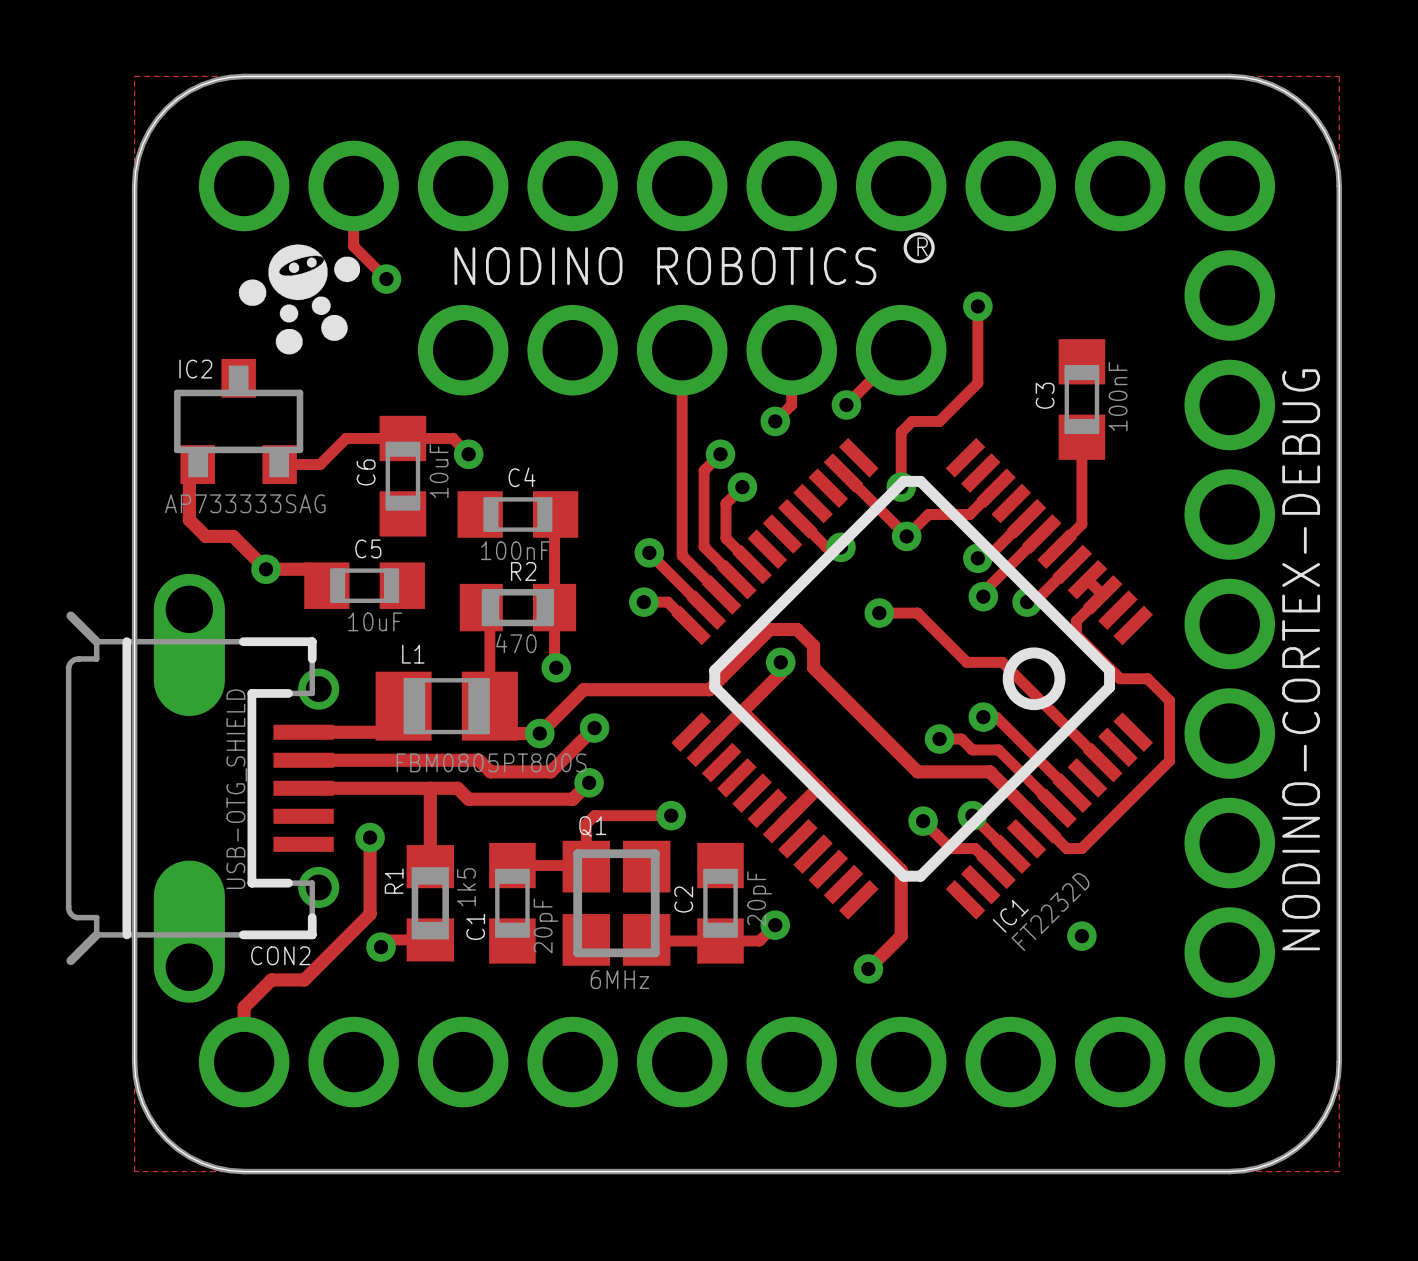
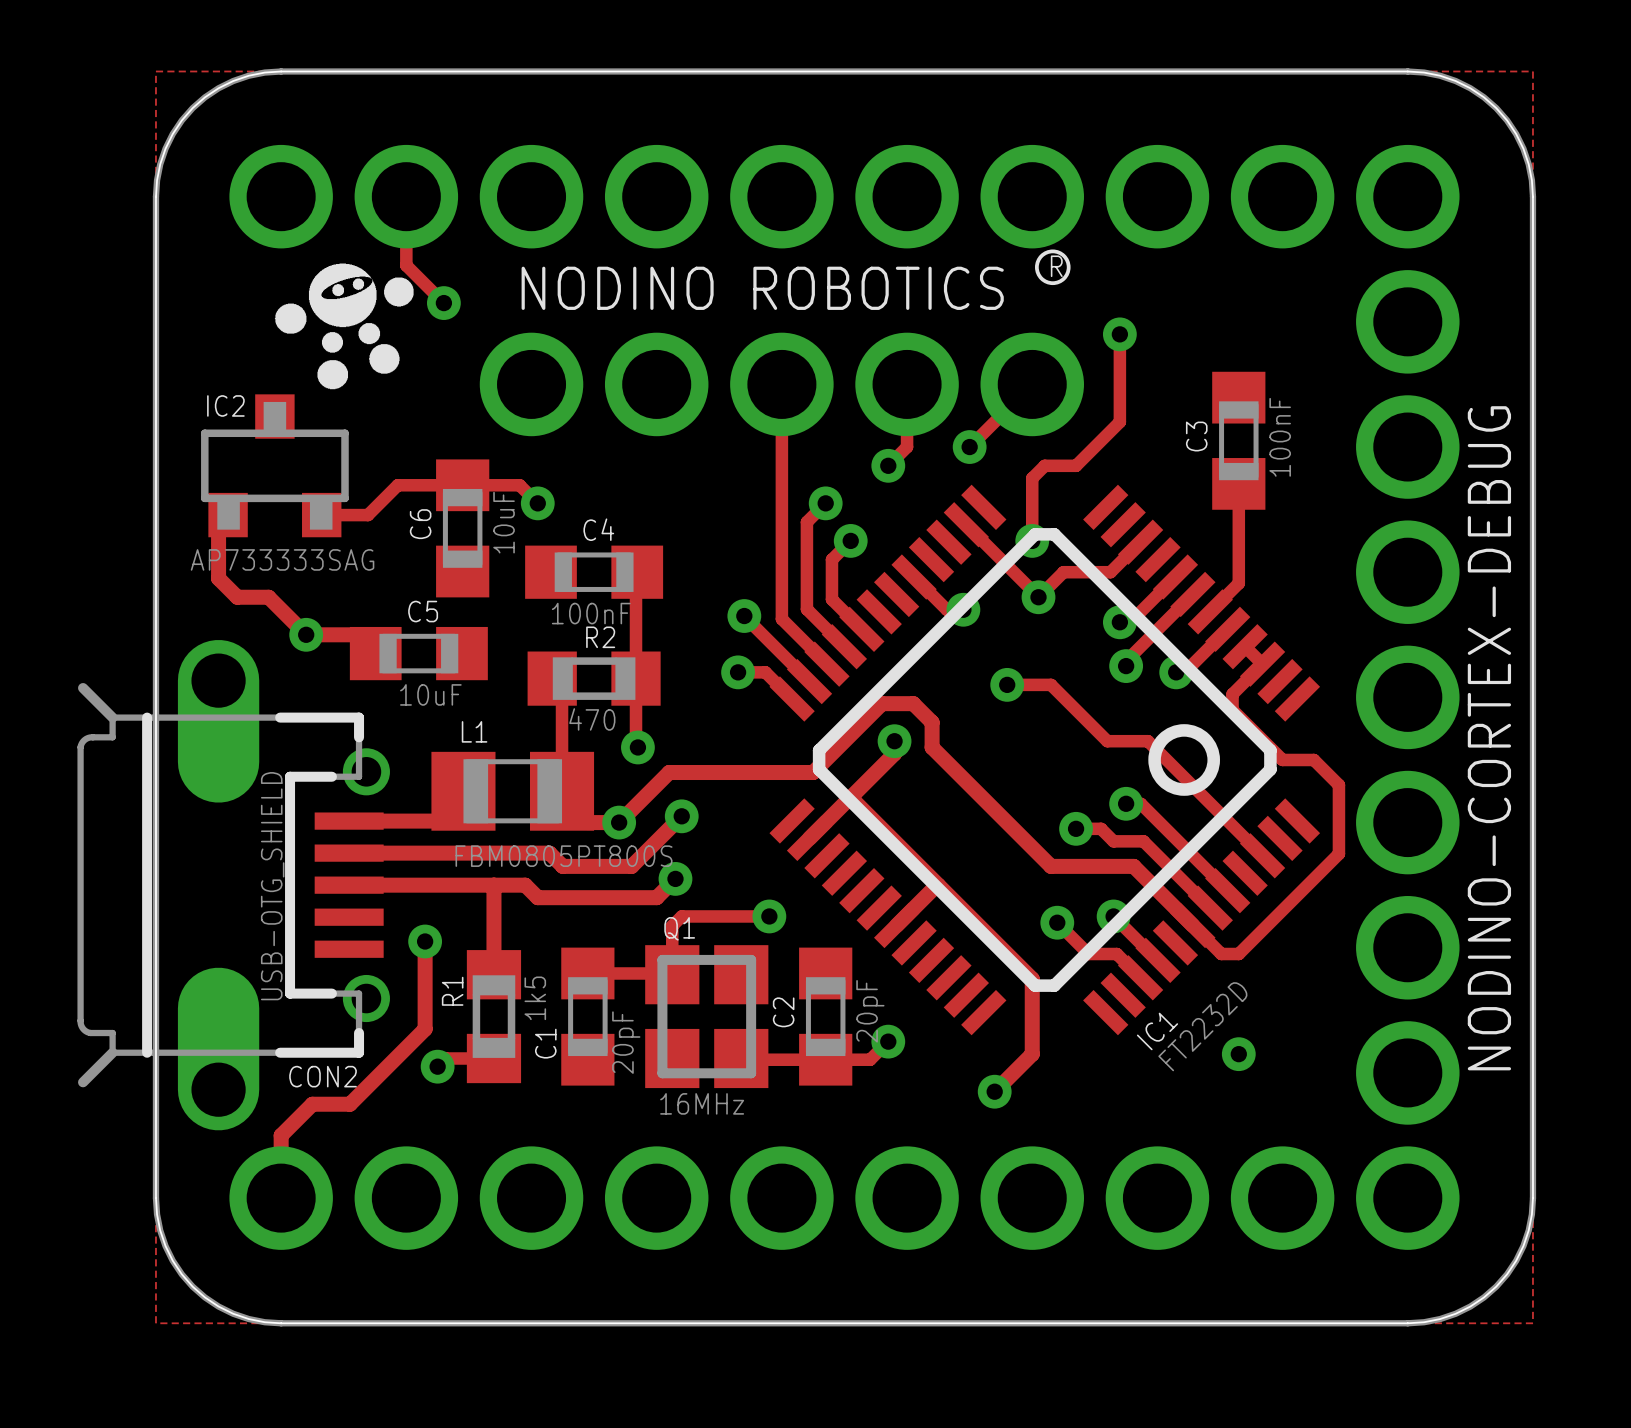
Q1 value: 6MHz (619, 979) -> 16MHz (702, 1103)

